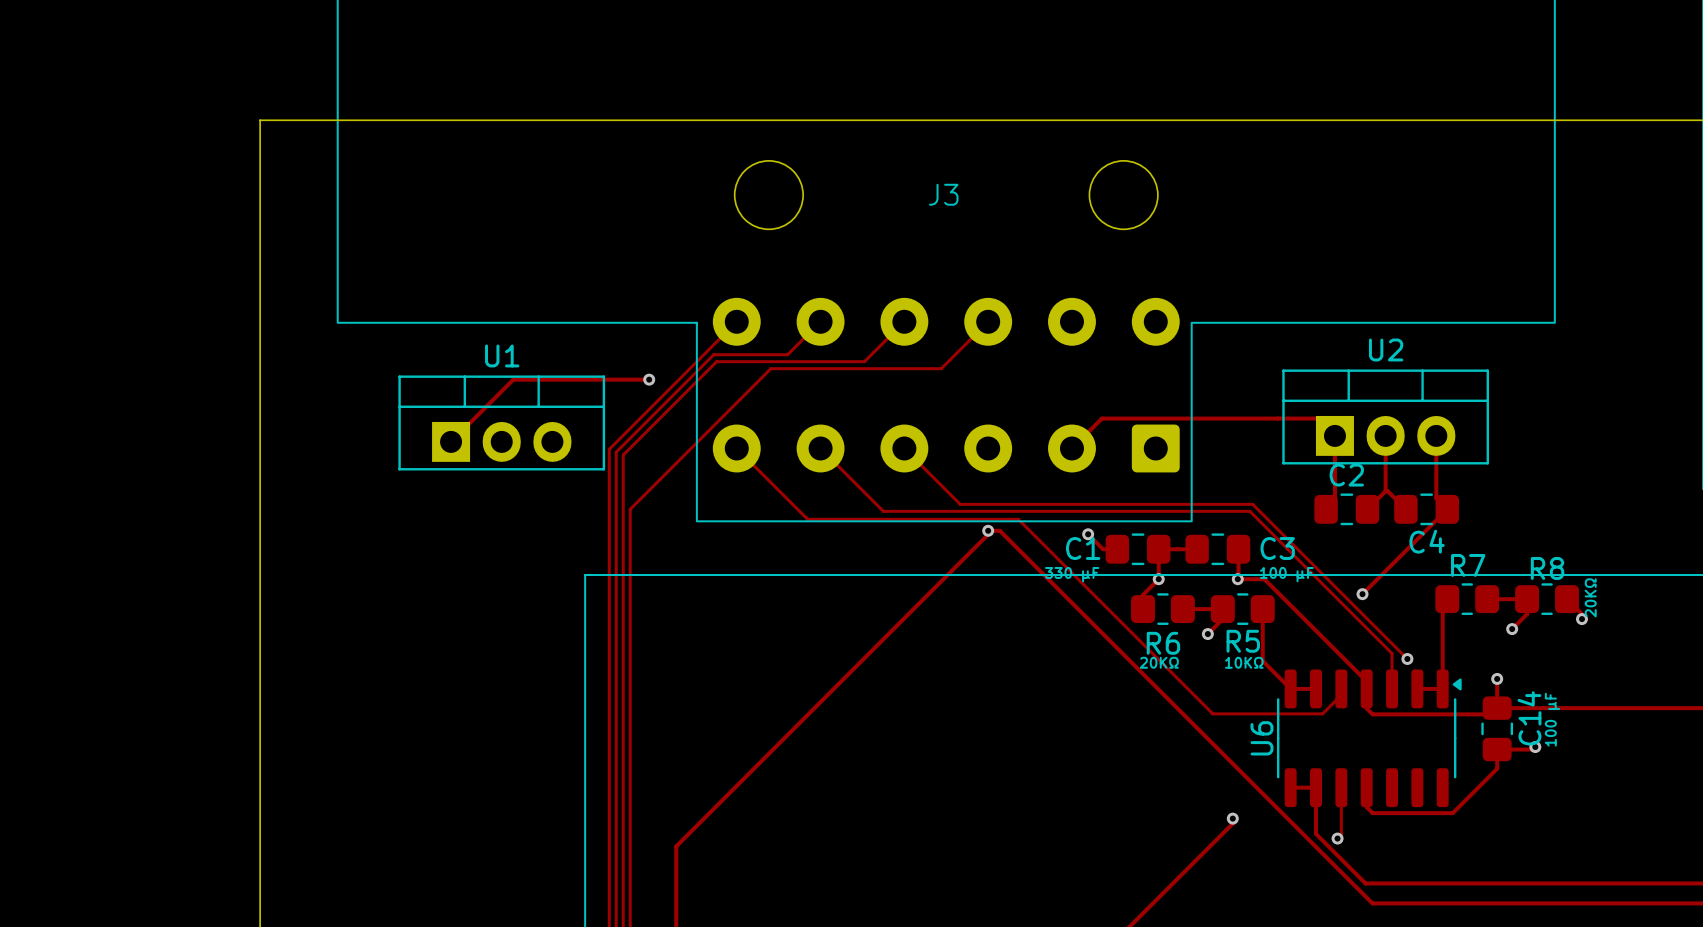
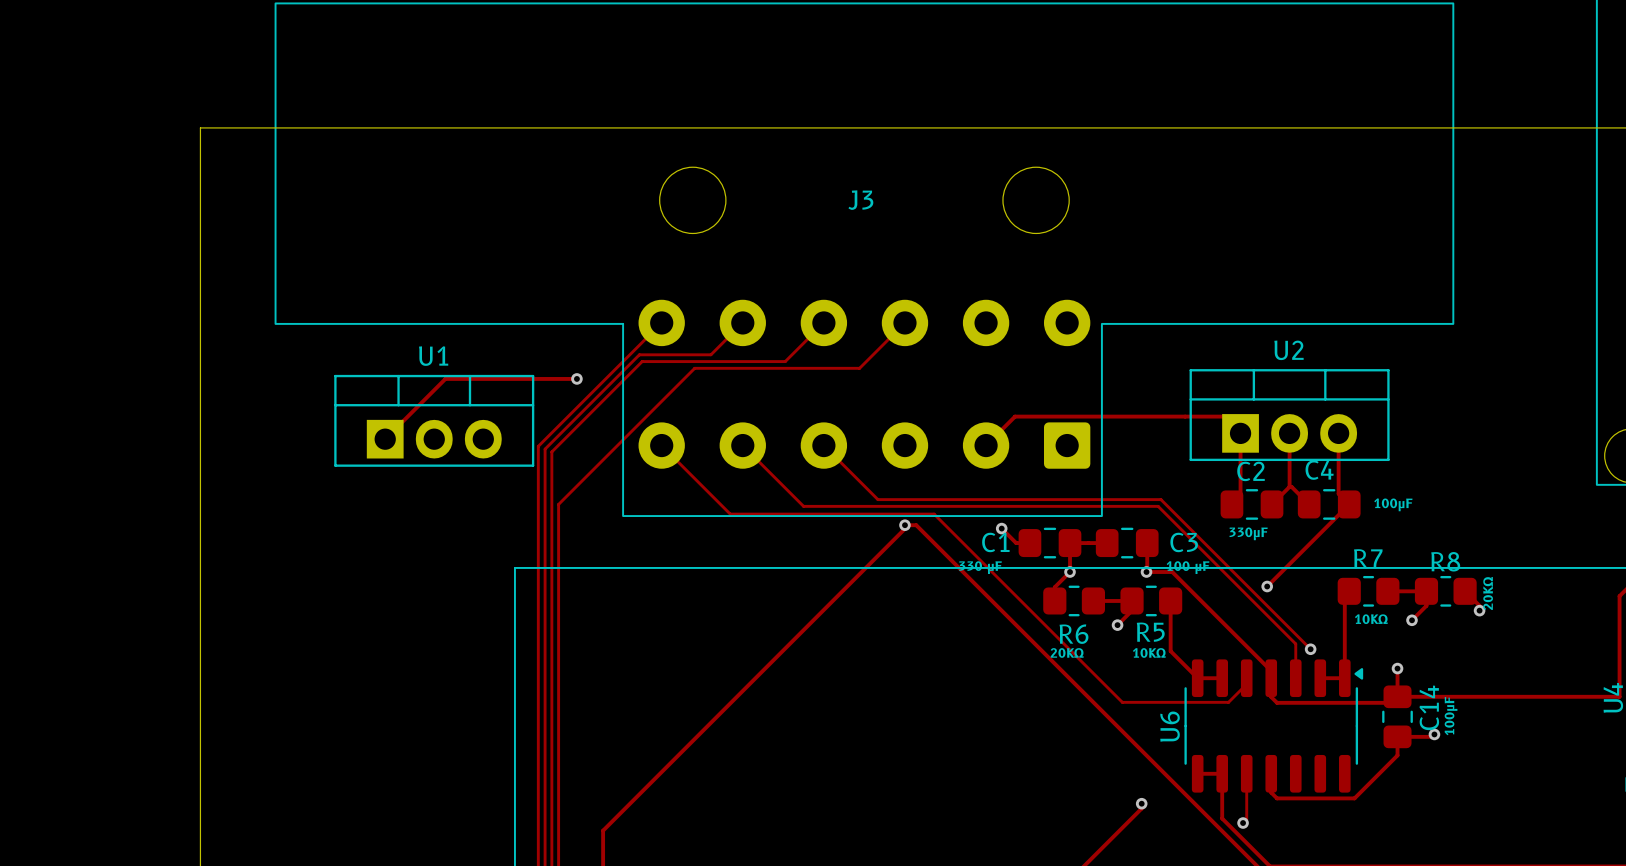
text: none -> 100μF (1393, 504)
text: none -> 330μF (1248, 533)
C4 name position: C4 (1427, 541) -> C4 (1319, 470)
text: none -> 10KΩ (1371, 619)
text: 100 μF (1552, 719) -> 100μF (1451, 716)

